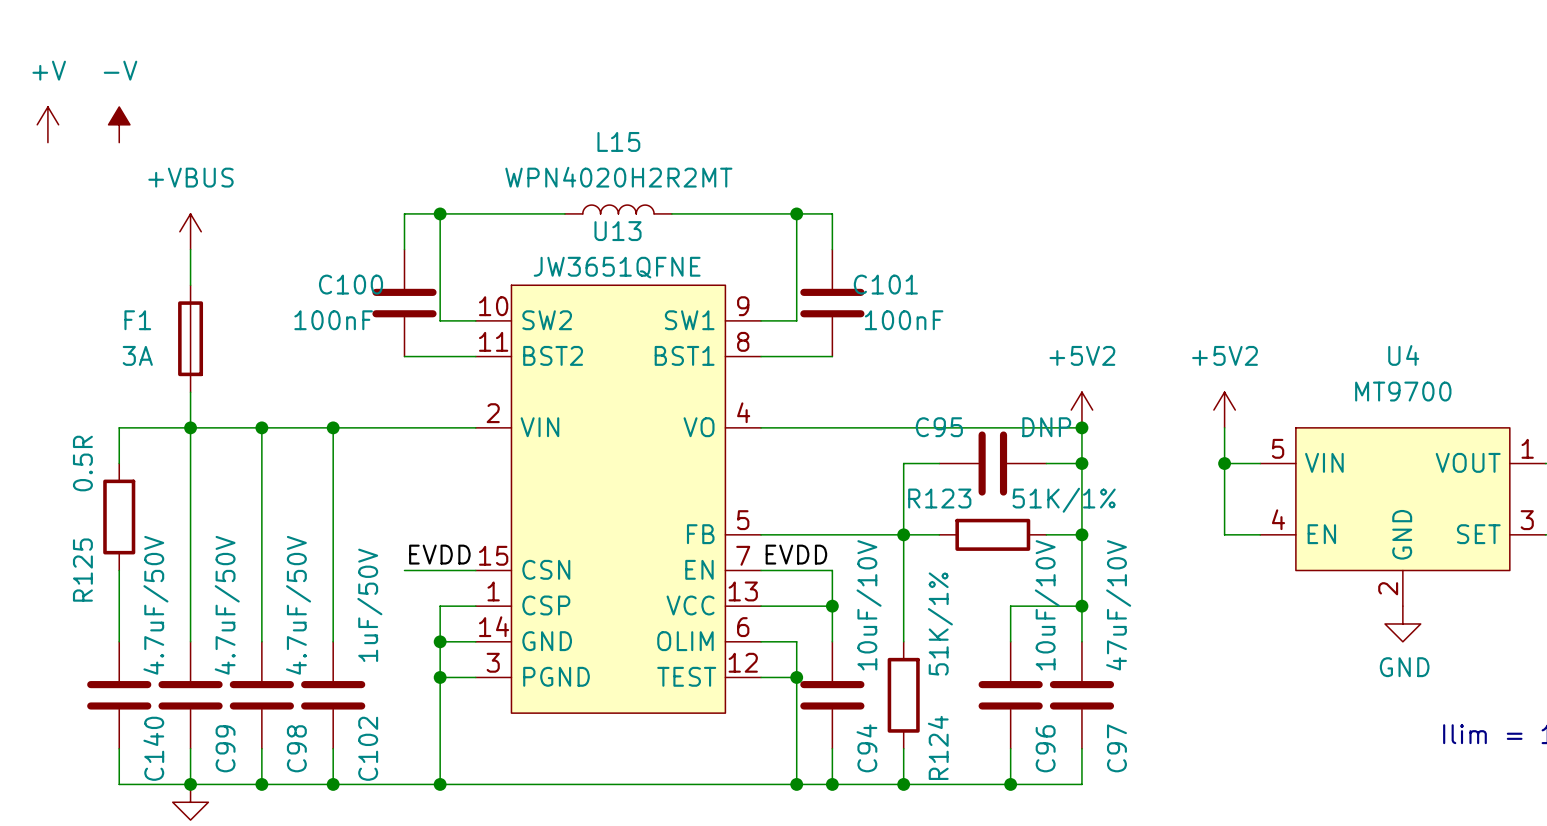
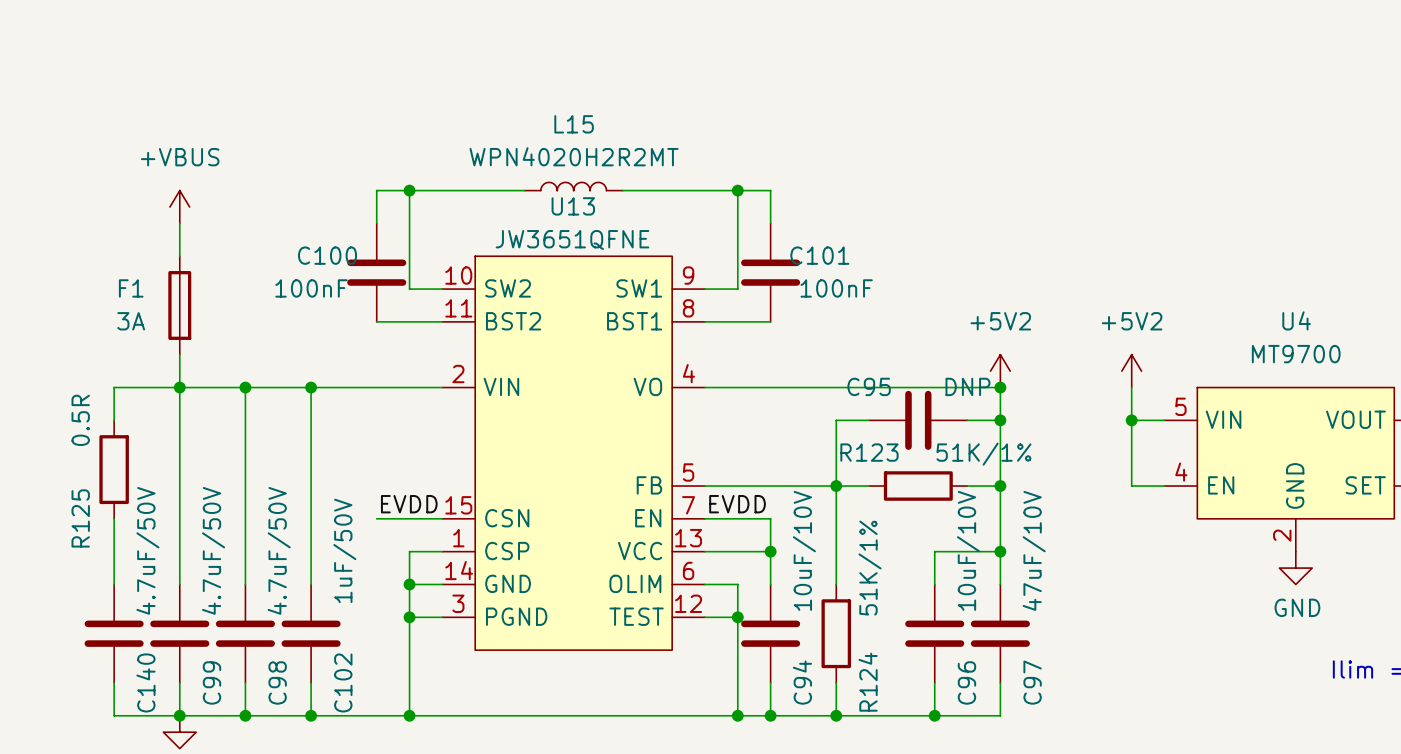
power symbol: +V (47, 124) -> none
power symbol: -V (119, 124) -> none

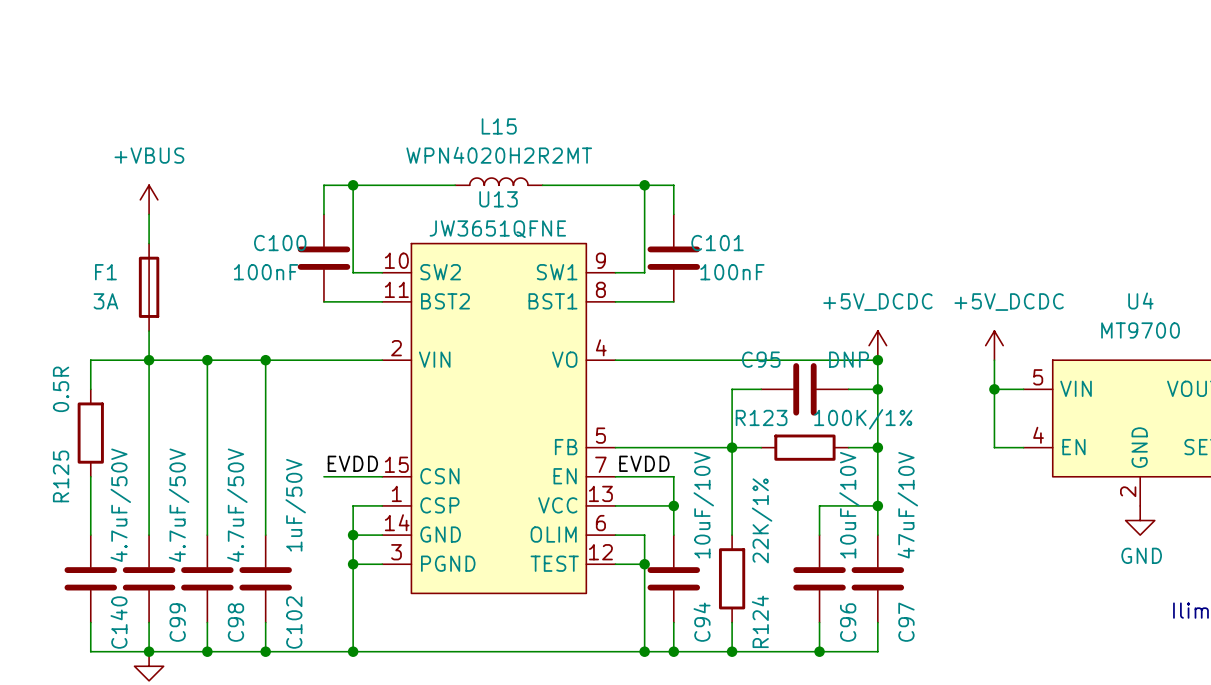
power symbol: +5V2 (1000, 371) -> +5V_DCDC (877, 345)
power symbol: +5V2 (1131, 371) -> +5V_DCDC (994, 345)
R123 value: 51K/1% (983, 454) -> 100K/1% (863, 419)
R124 value: 51K/1% (870, 568) -> 22K/1% (762, 520)

